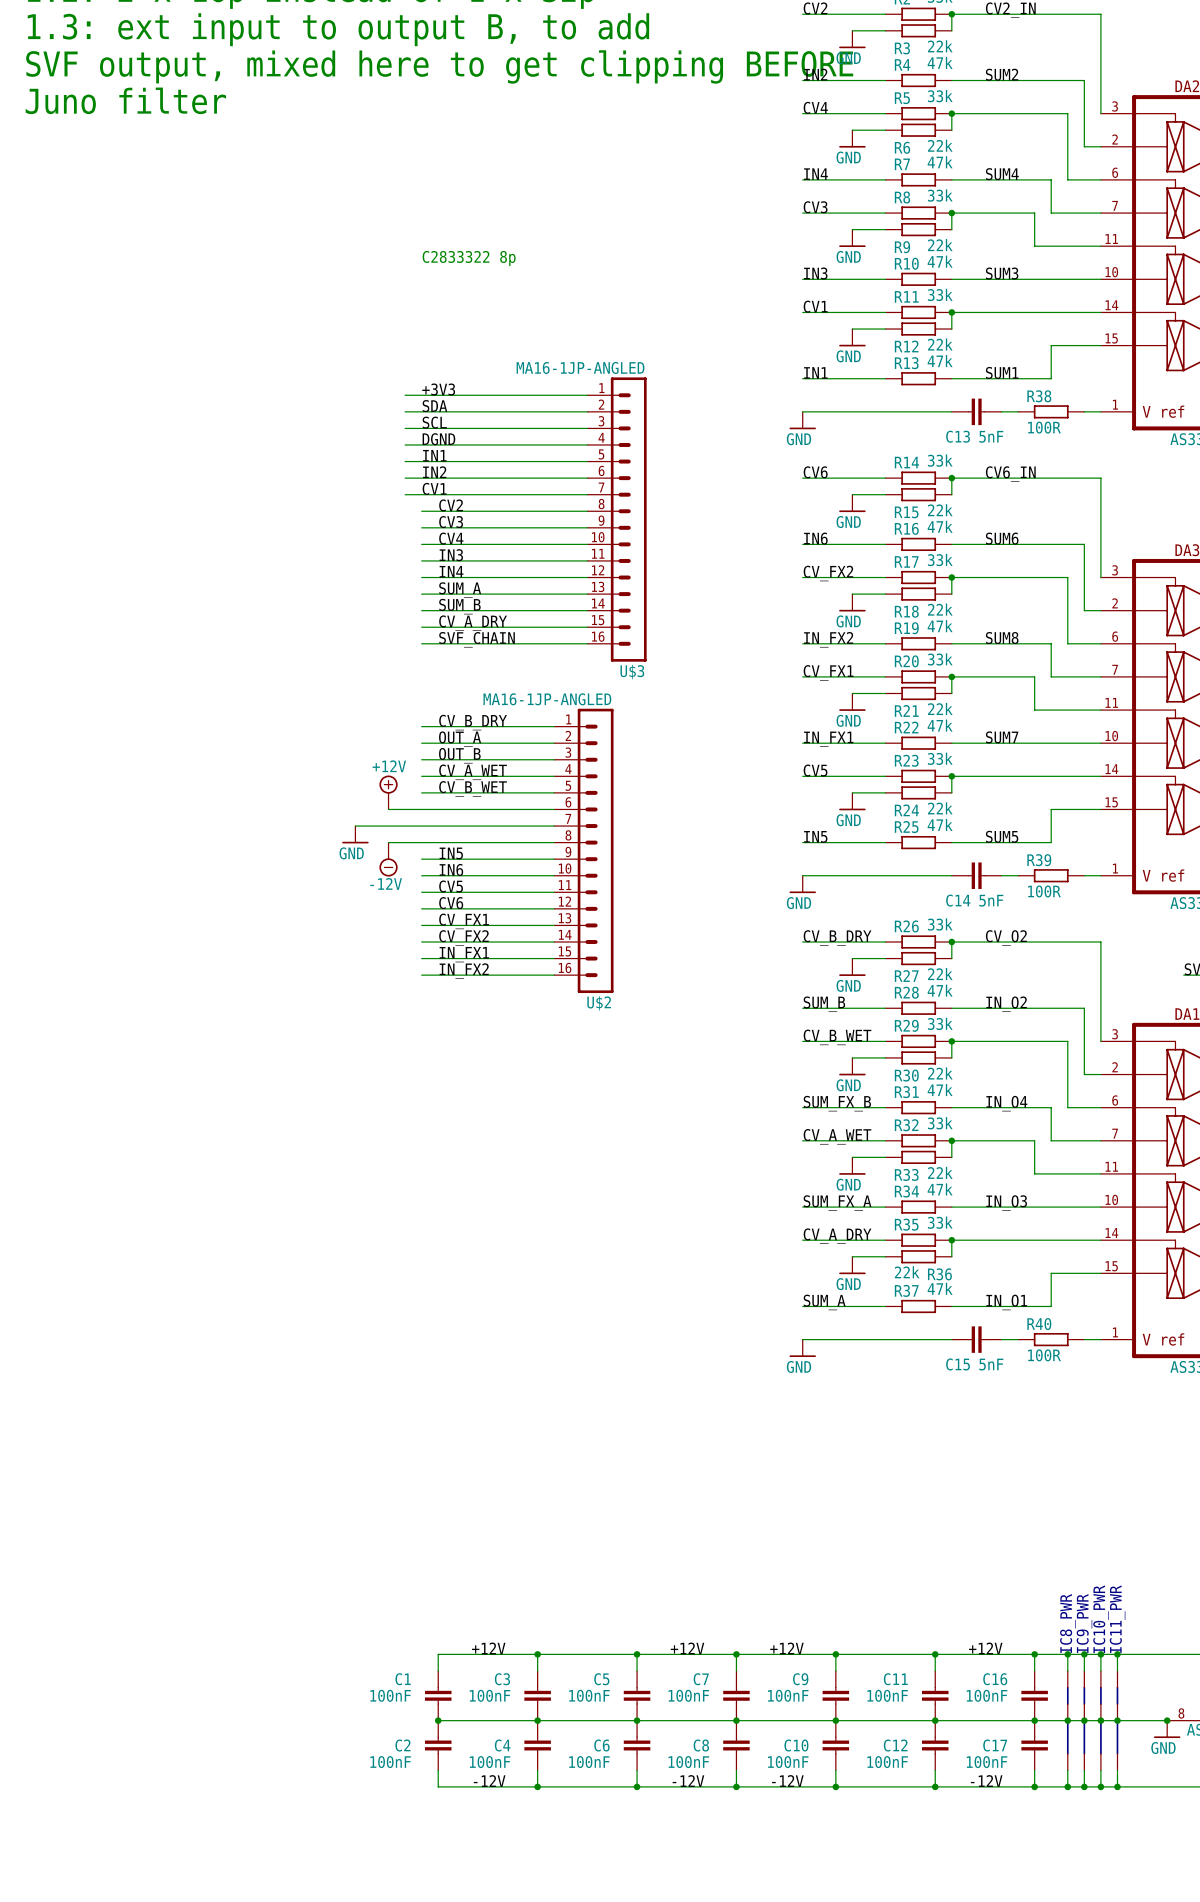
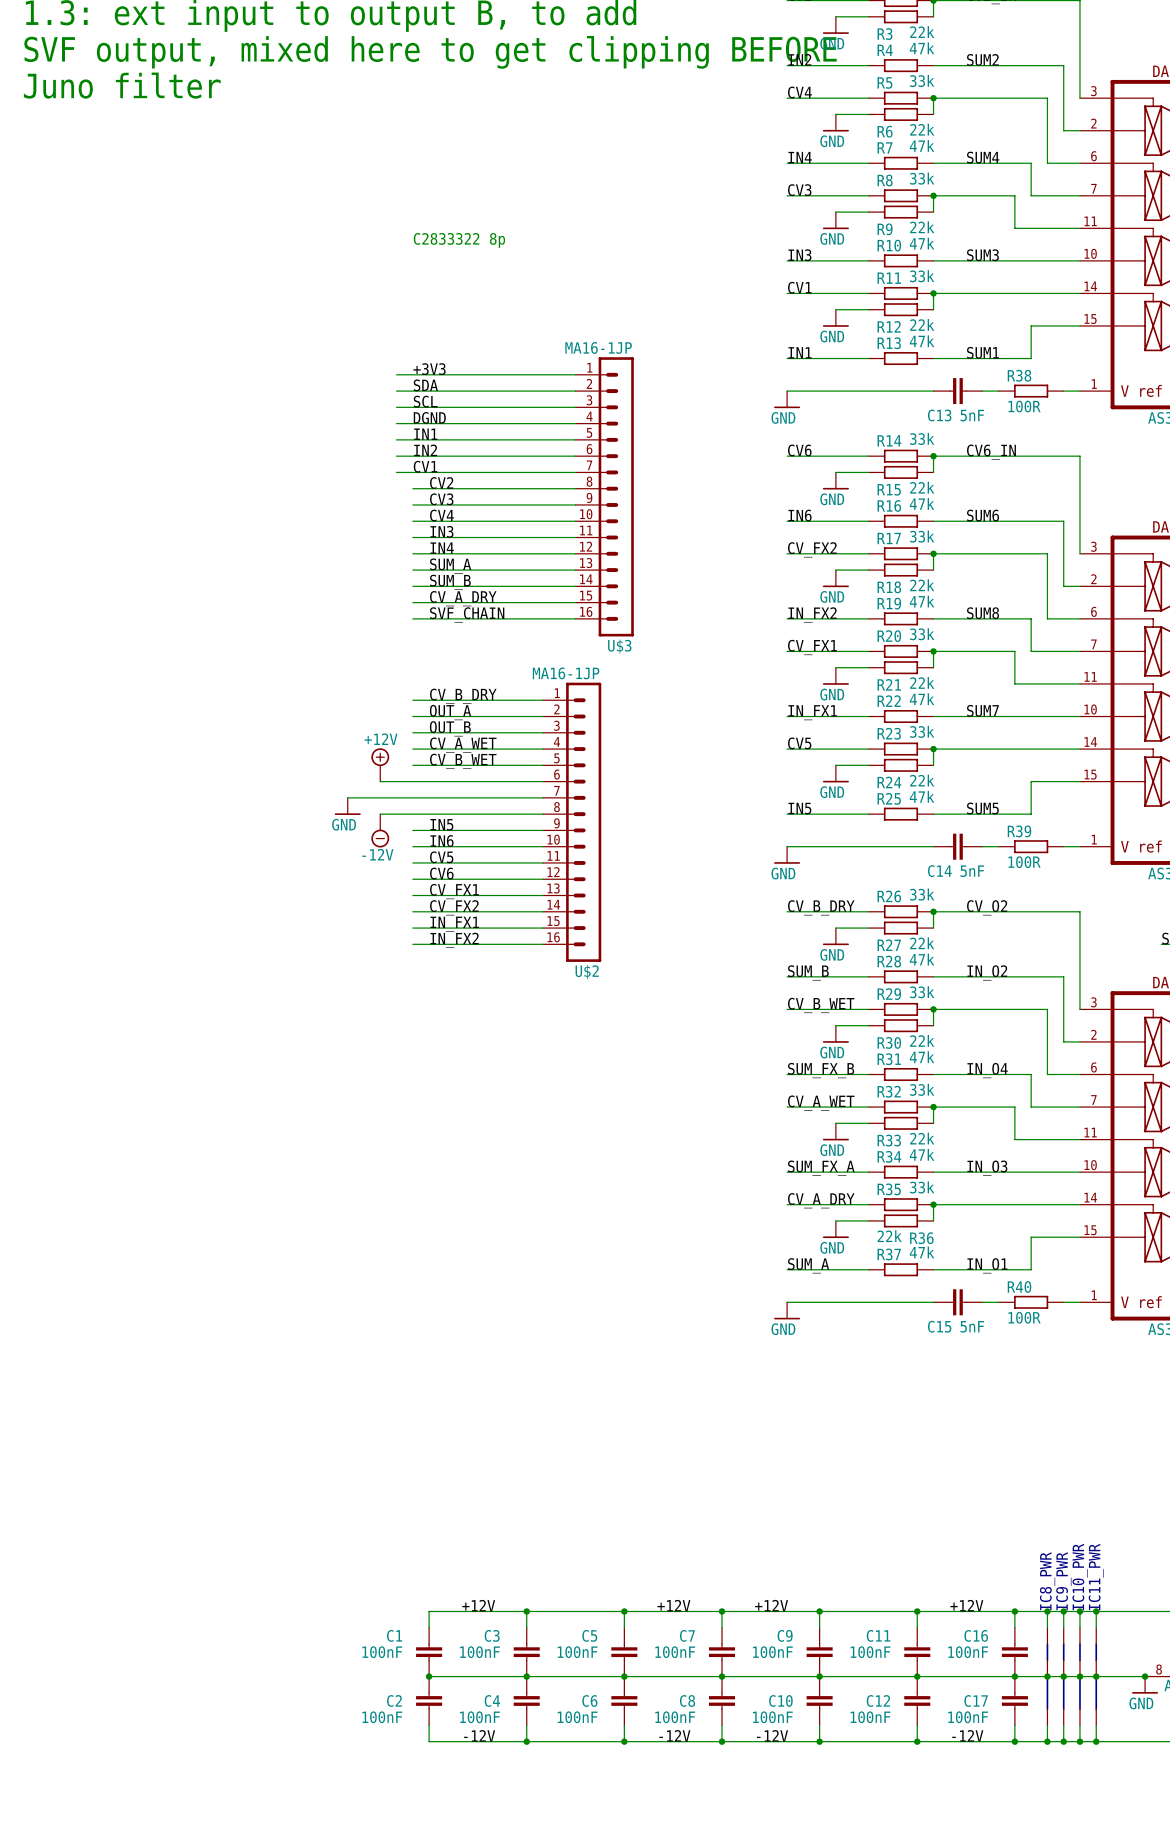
U$3 value: MA16-1JP-ANGLED (580, 367) -> MA16-1JP (598, 347)
U$2 value: MA16-1JP-ANGLED (547, 699) -> MA16-1JP (566, 673)

